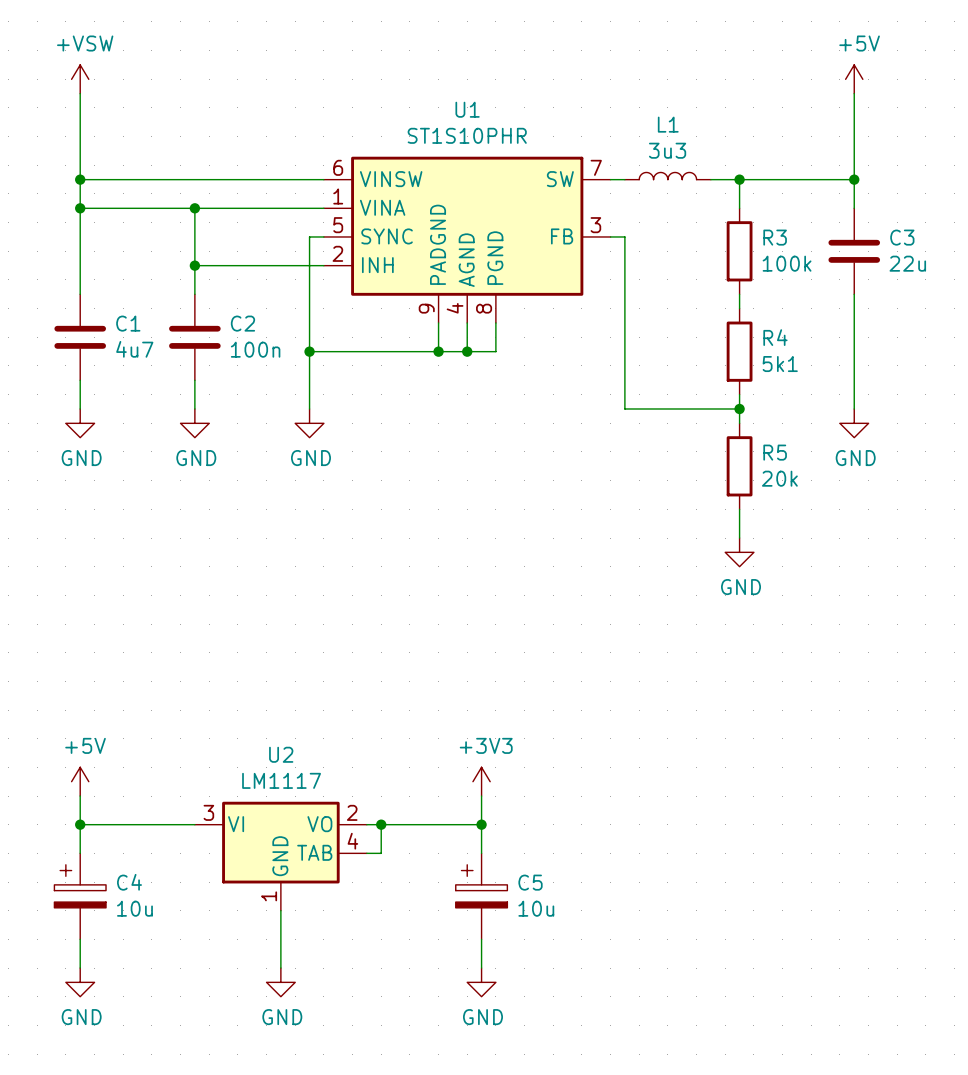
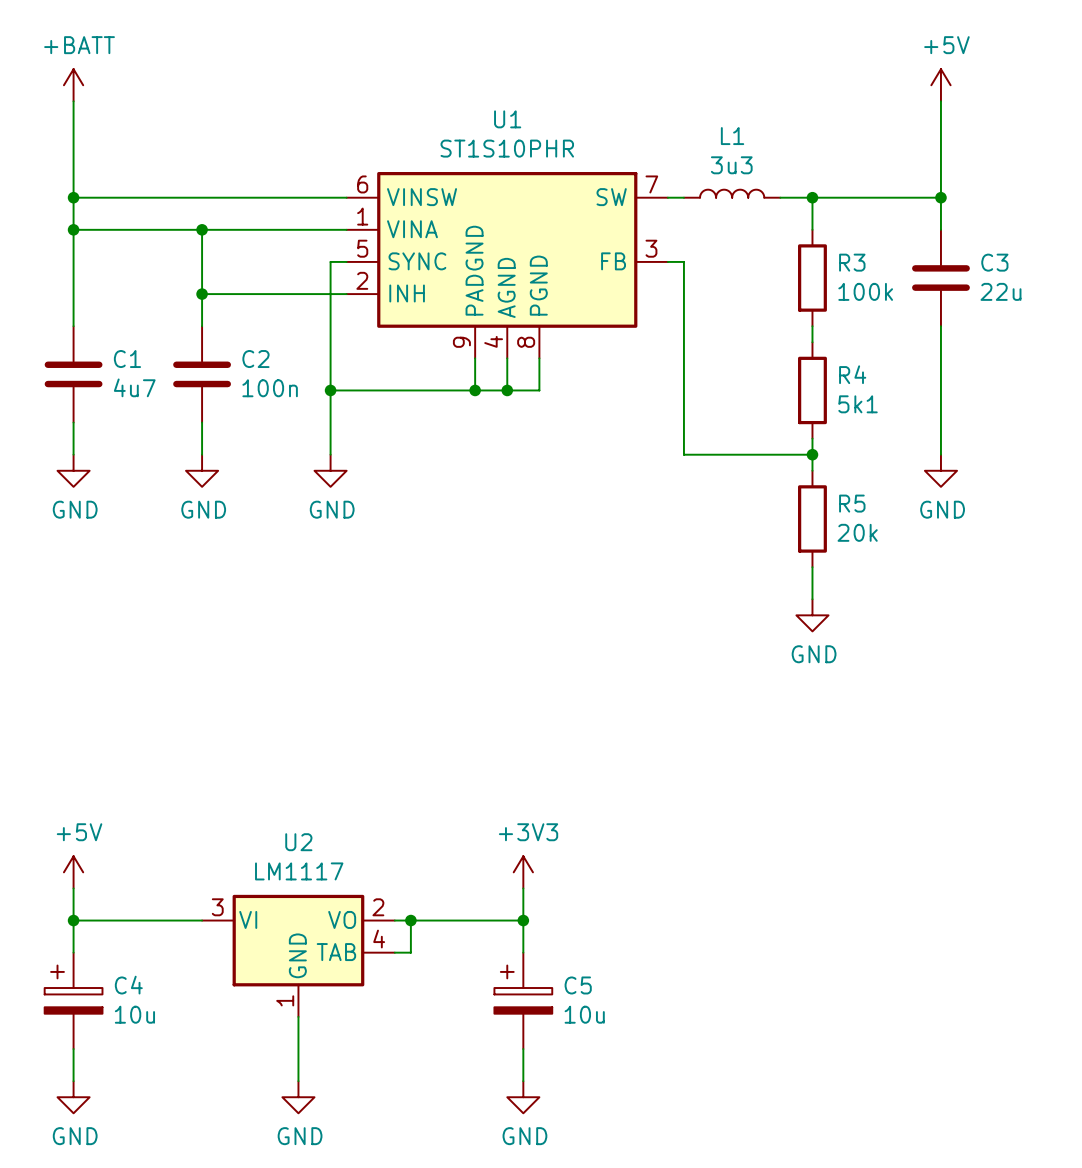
power symbol: +VSW (80, 79) -> +BATT (73, 85)

